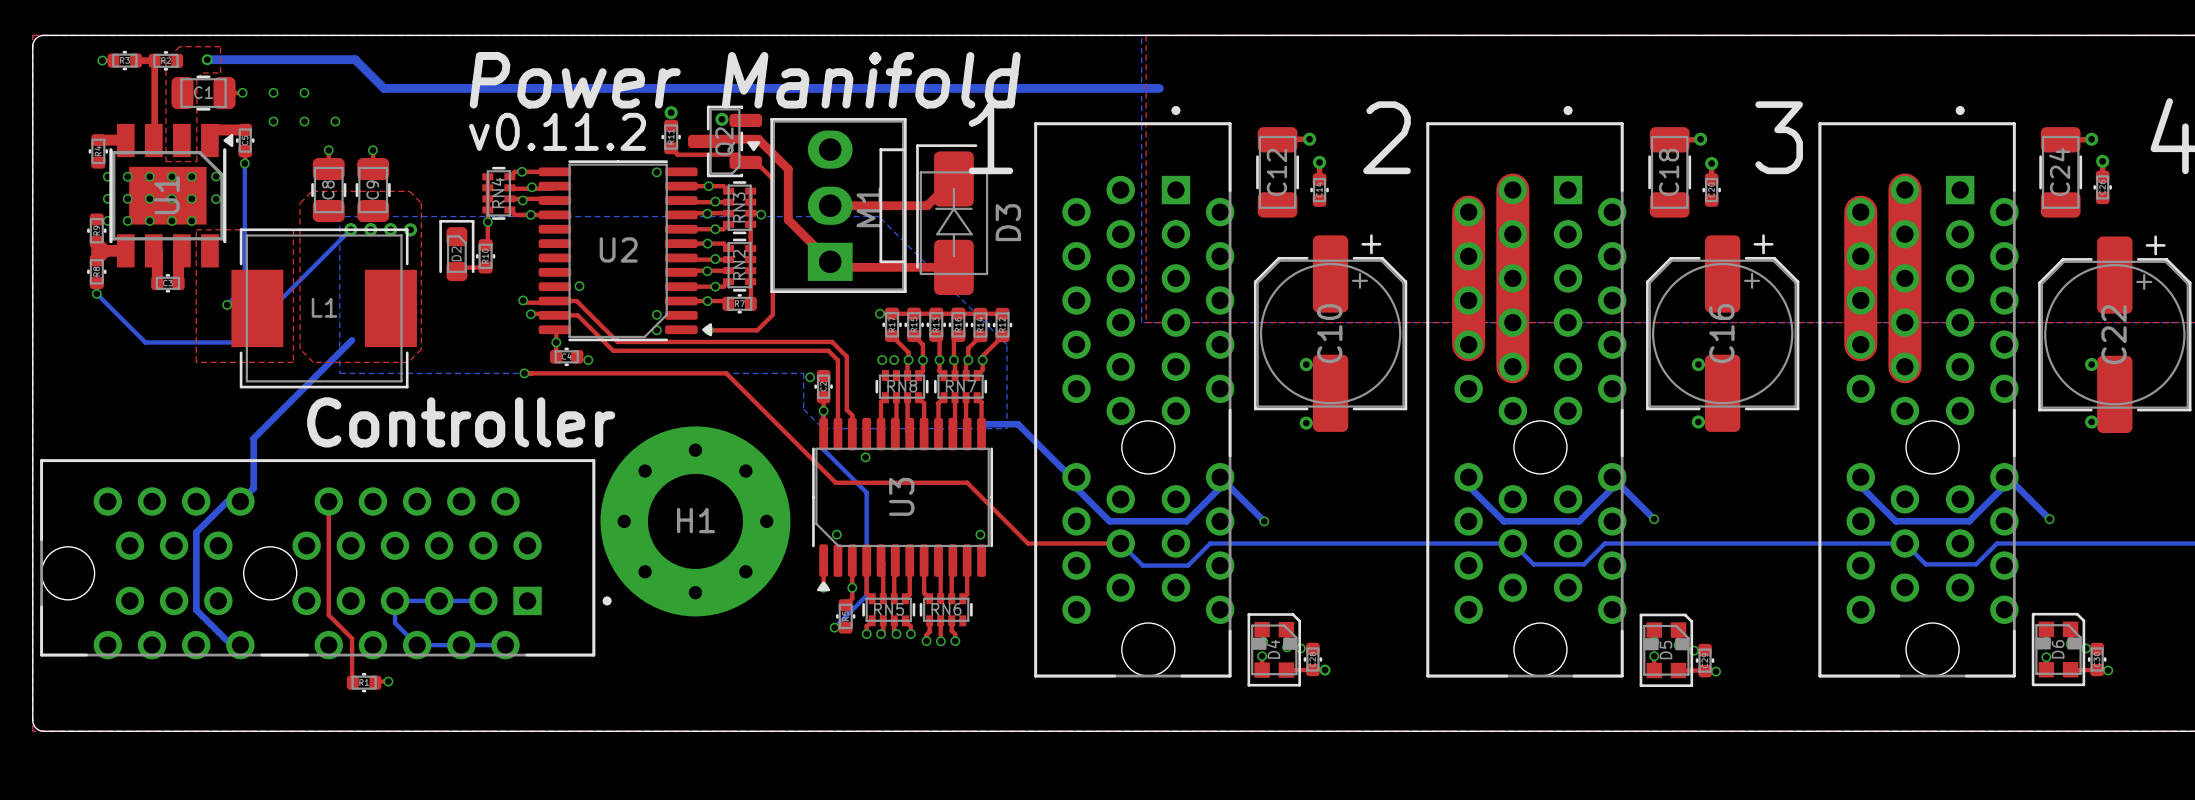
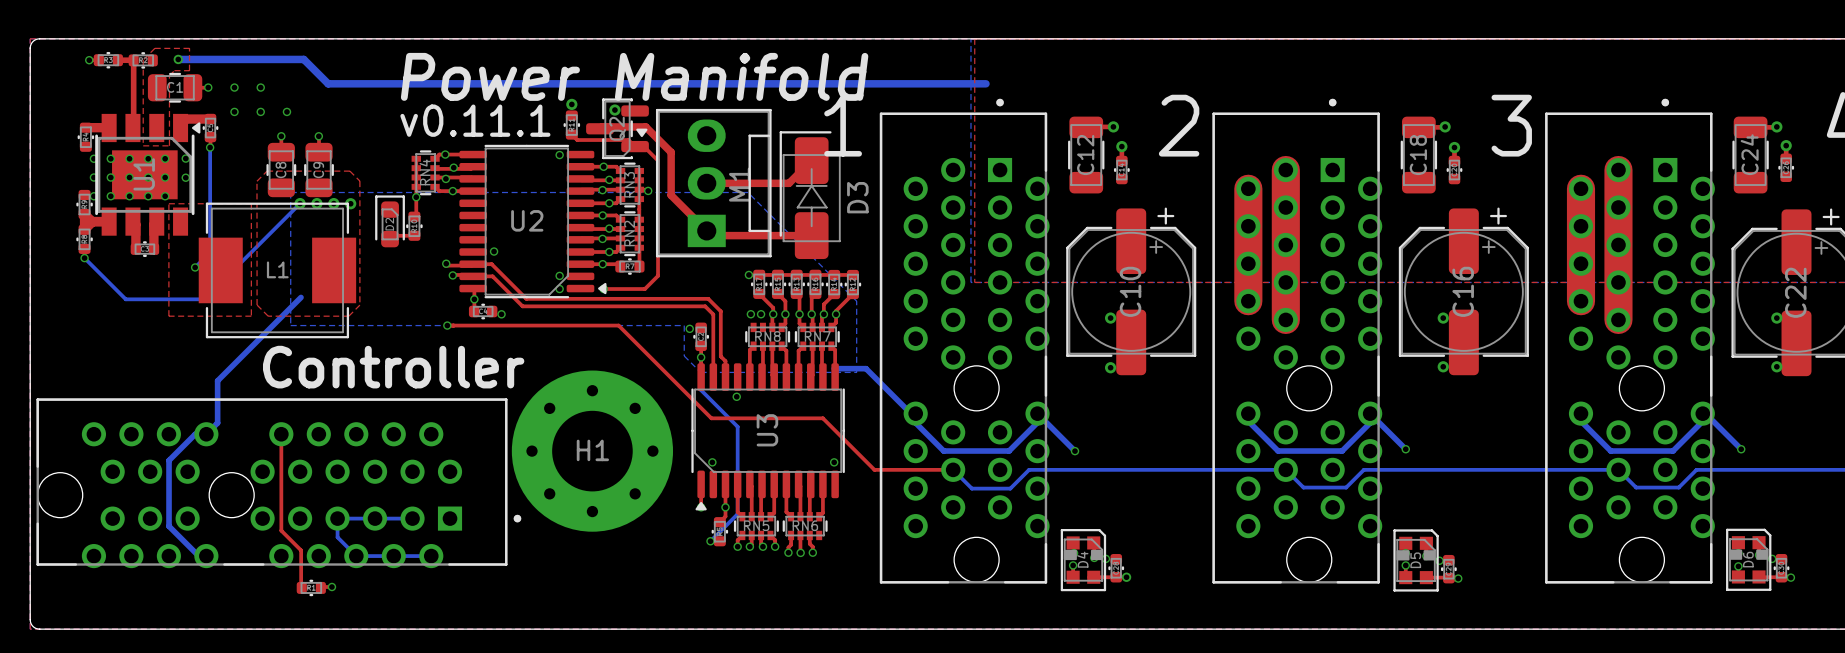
text: v0.11.2 (557, 131) -> v0.11.1 (475, 120)

